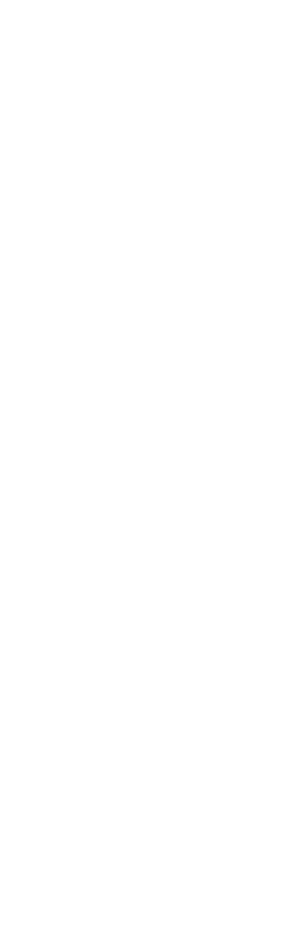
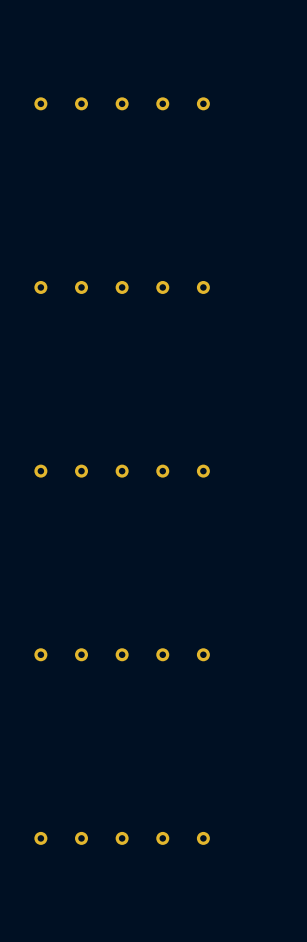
part: none -> (122, 103)
part: none -> (122, 287)
part: none -> (122, 471)
part: none -> (122, 654)
part: none -> (122, 838)

